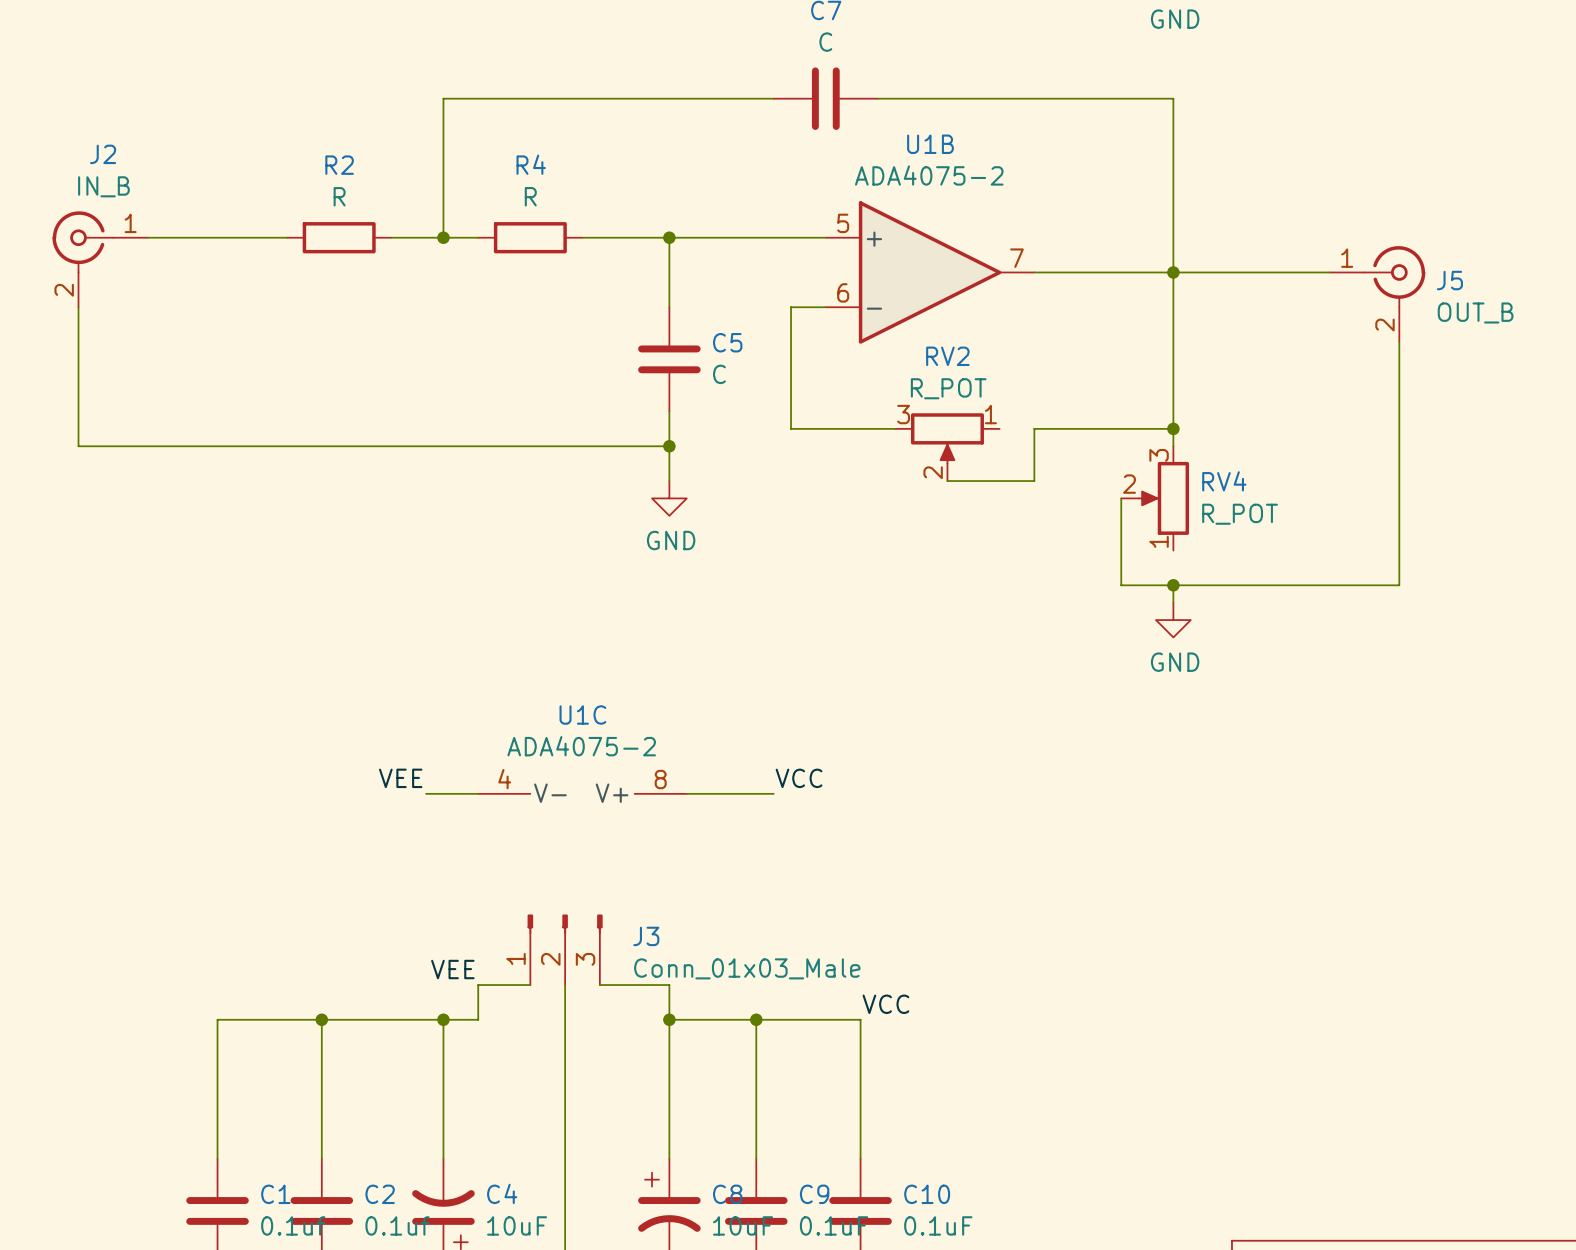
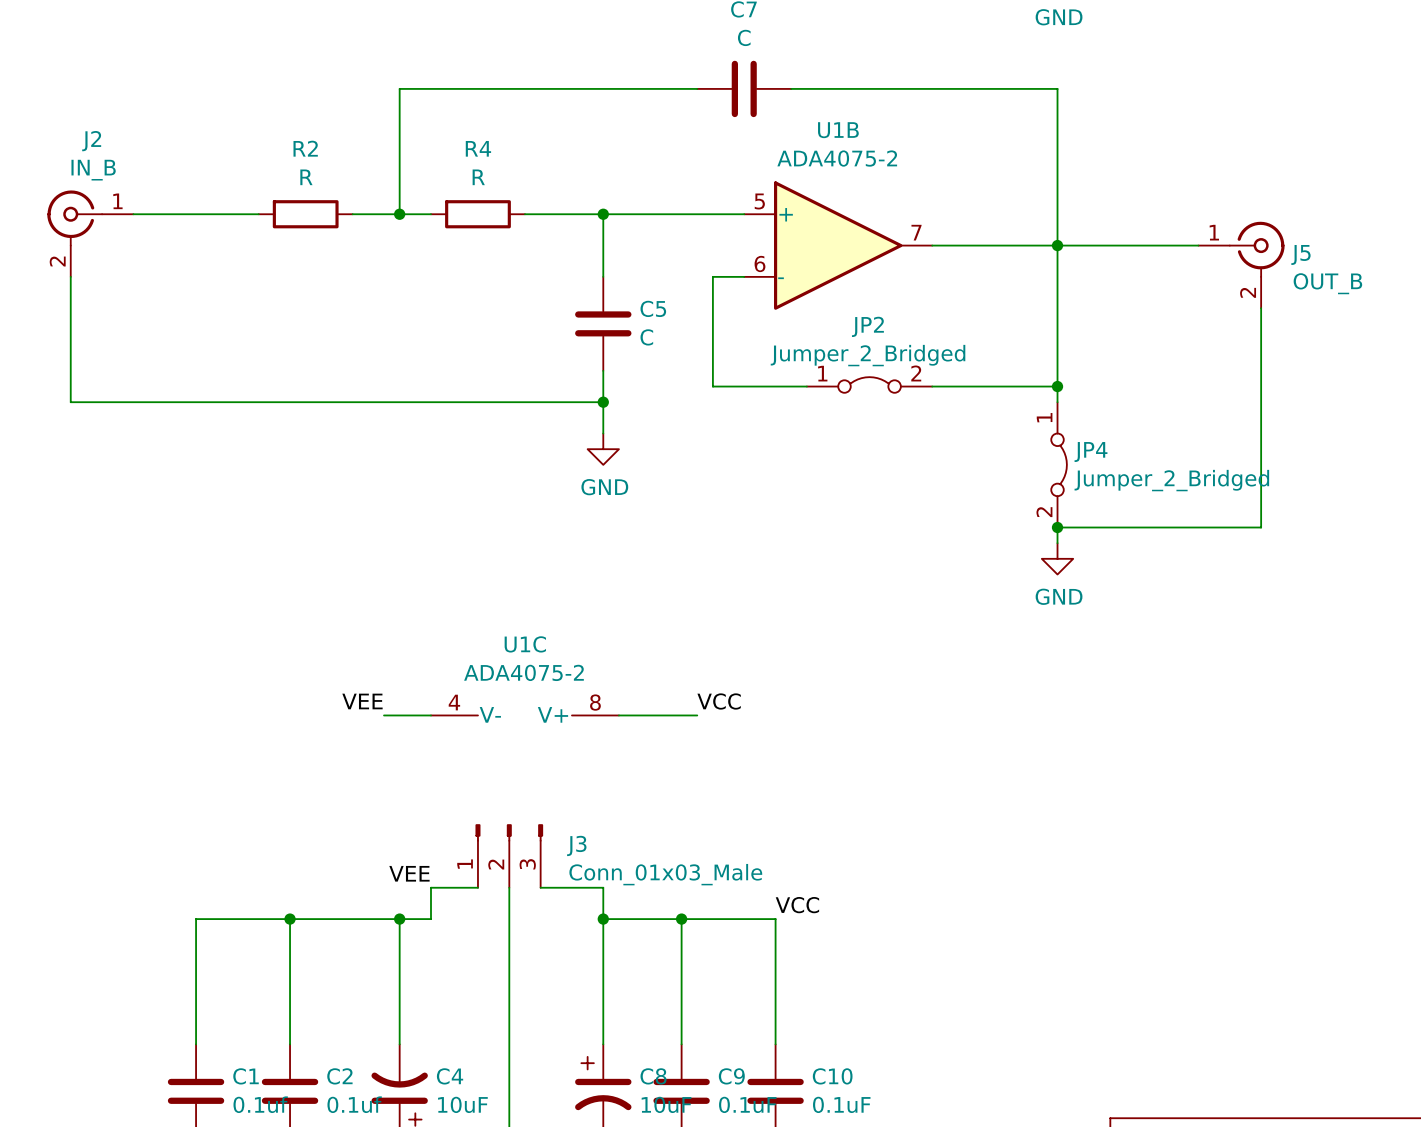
JP2: none -> Jumper_2_Bridged (869, 384)
wire: (1034, 428) (1034, 481) (947, 481) -> none
RV2: R_POT (947, 447) -> none
wire: (1121, 498) (1121, 585) (1173, 585) -> none
RV4: R_POT (1155, 498) -> none
JP4: none -> Jumper_2_Bridged (1059, 464)

